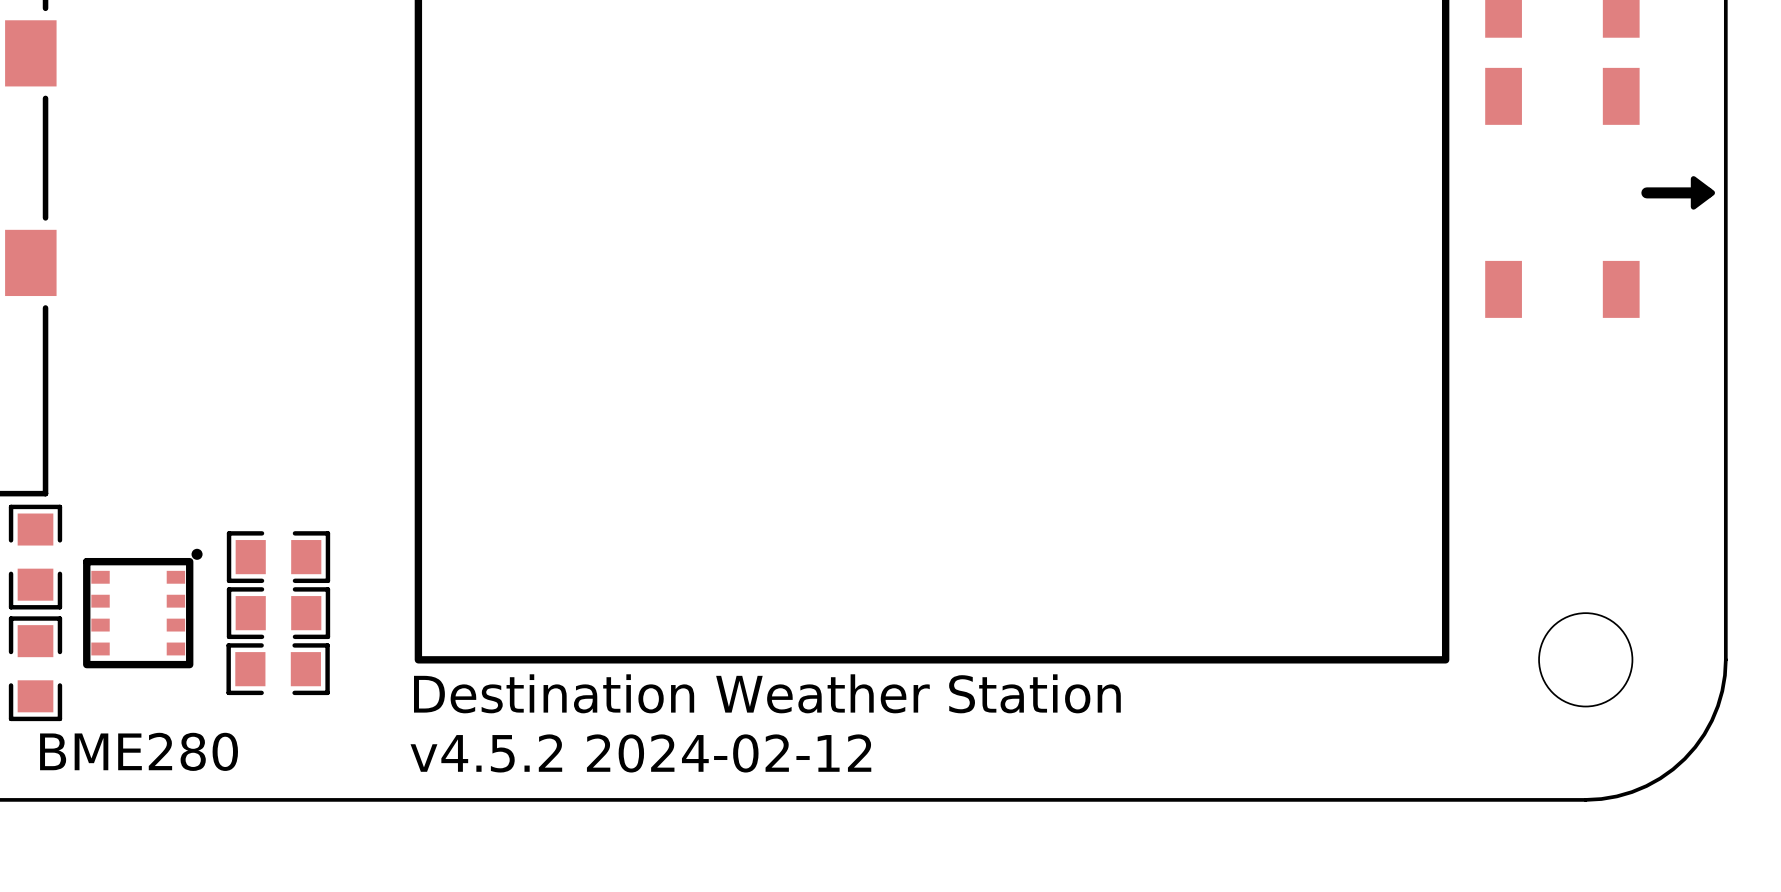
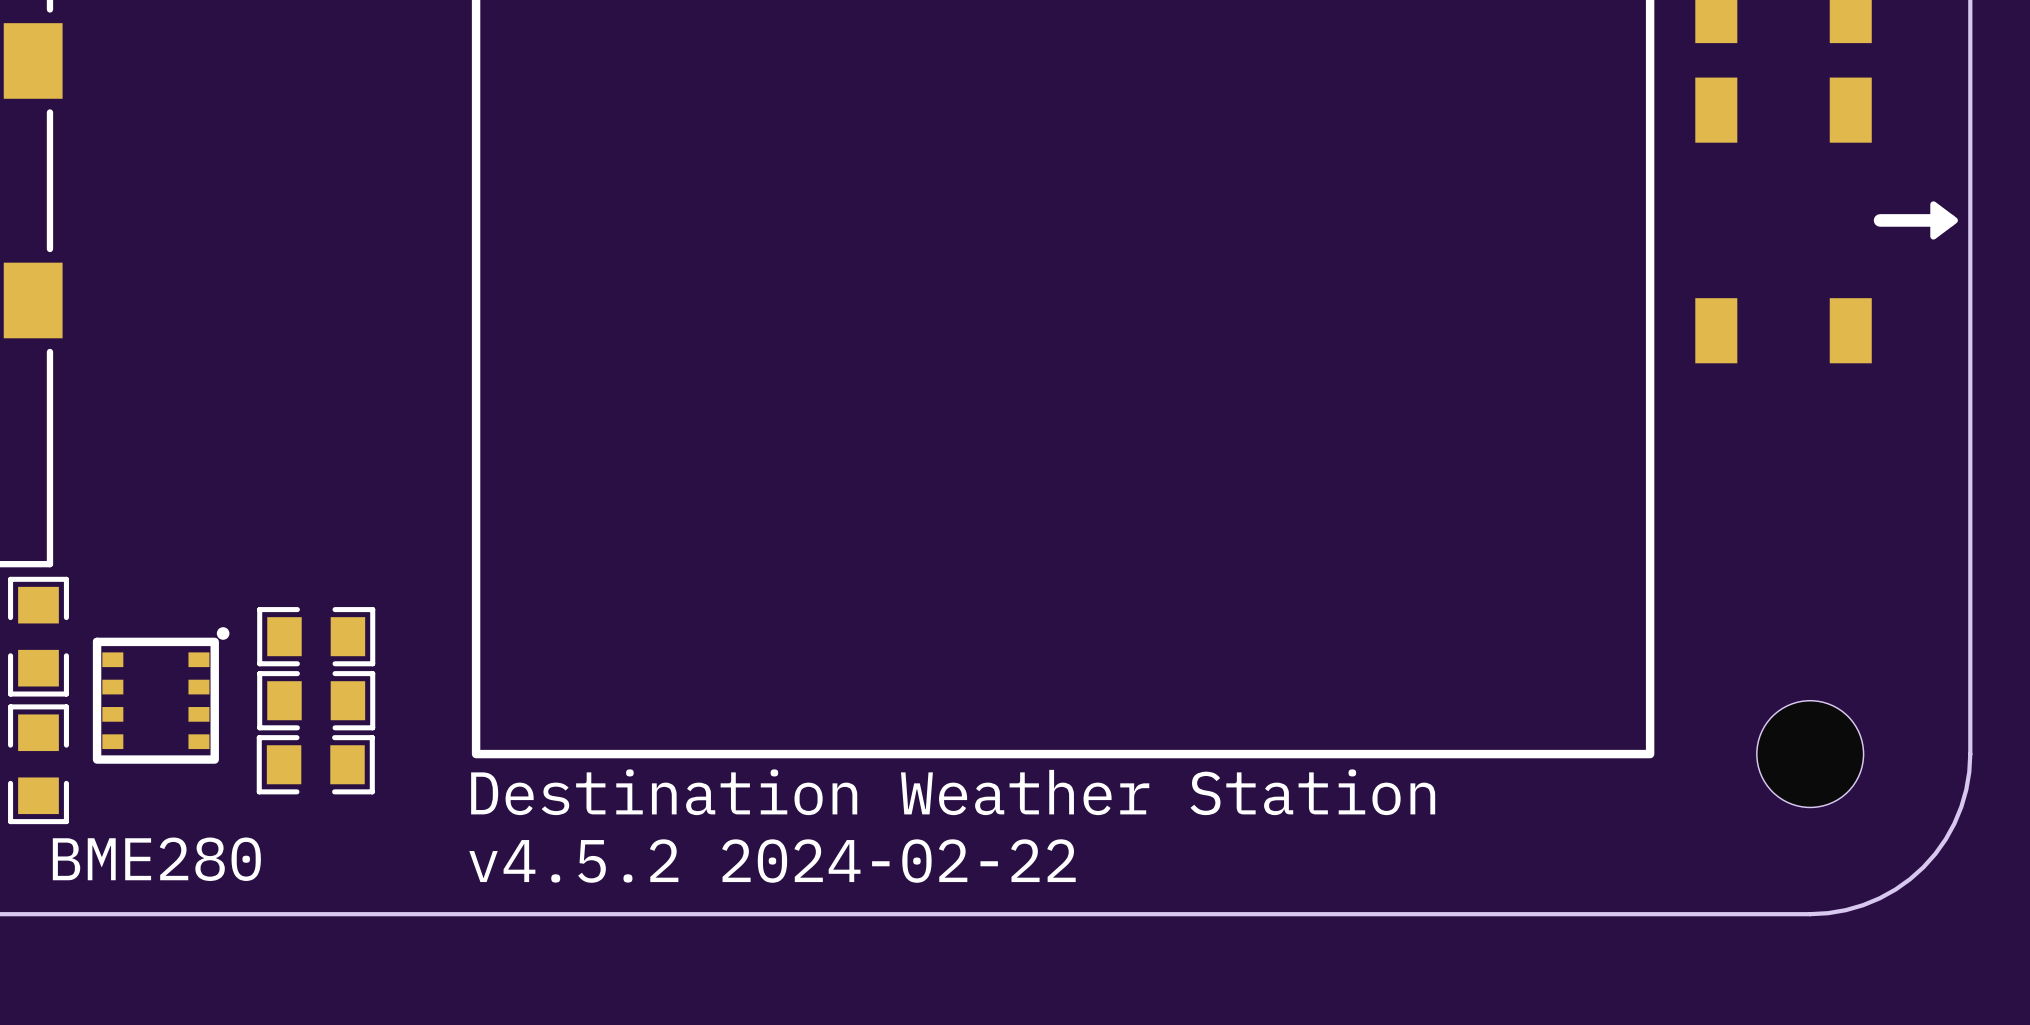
text: v4.5.2 2024-02-12 (640, 753) -> v4.5.2 2024-02-22 (772, 861)

